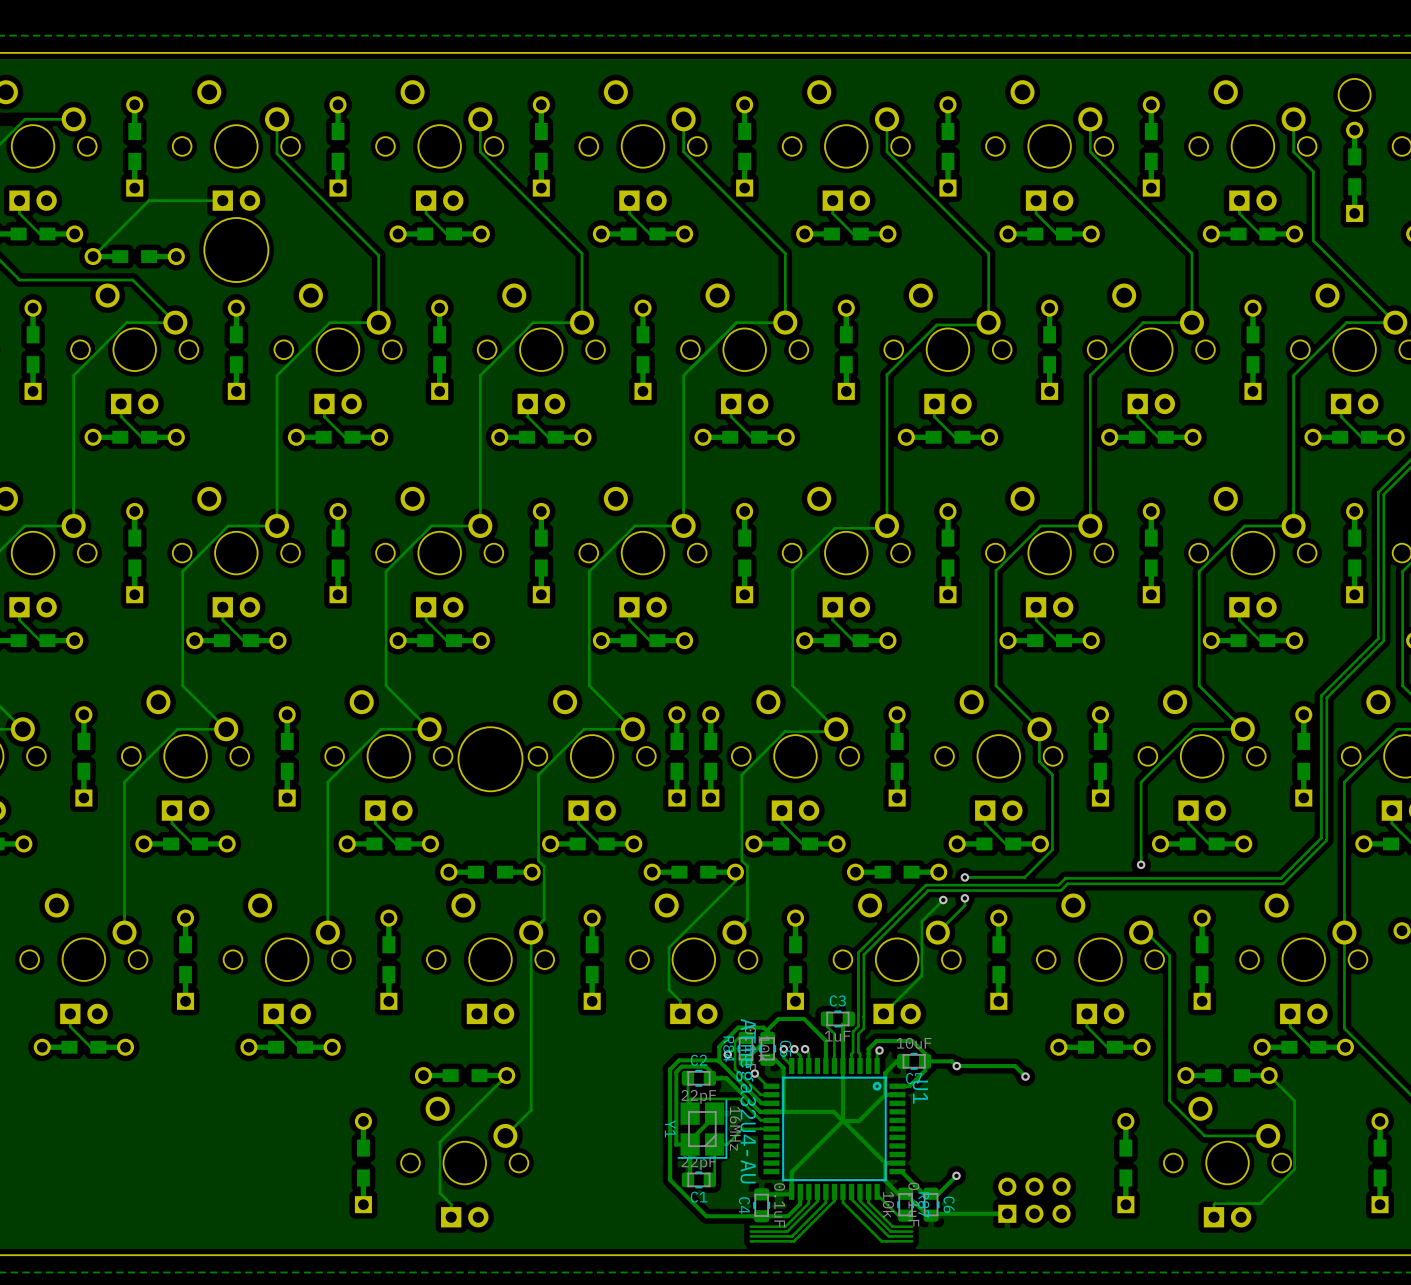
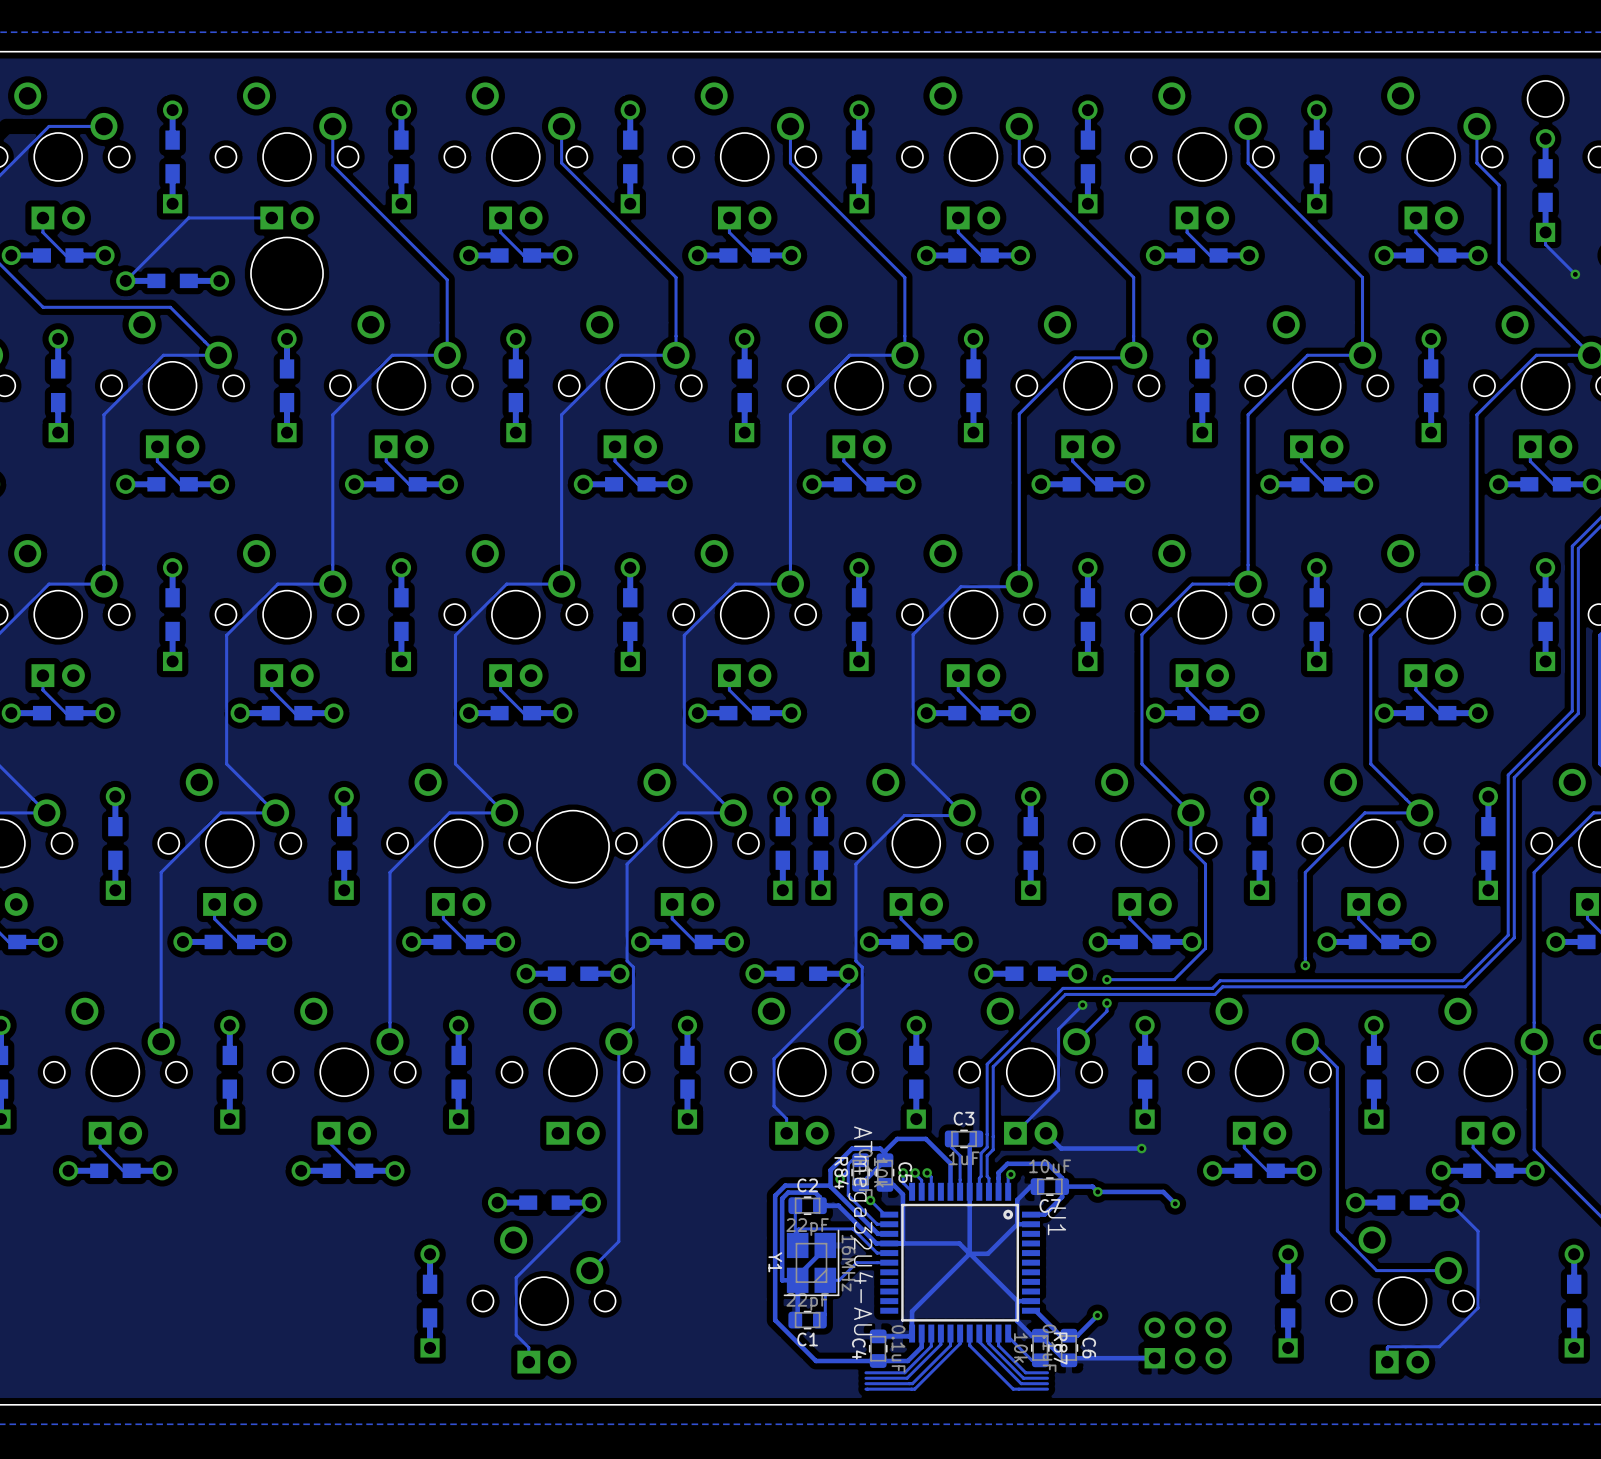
track: none -> (1545, 232) (1545, 244) (1575, 274)
via: none -> (1575, 274)
track: none -> (1045, 1133) (1061, 1148) (1141, 1148)
via: none -> (1141, 1148)

